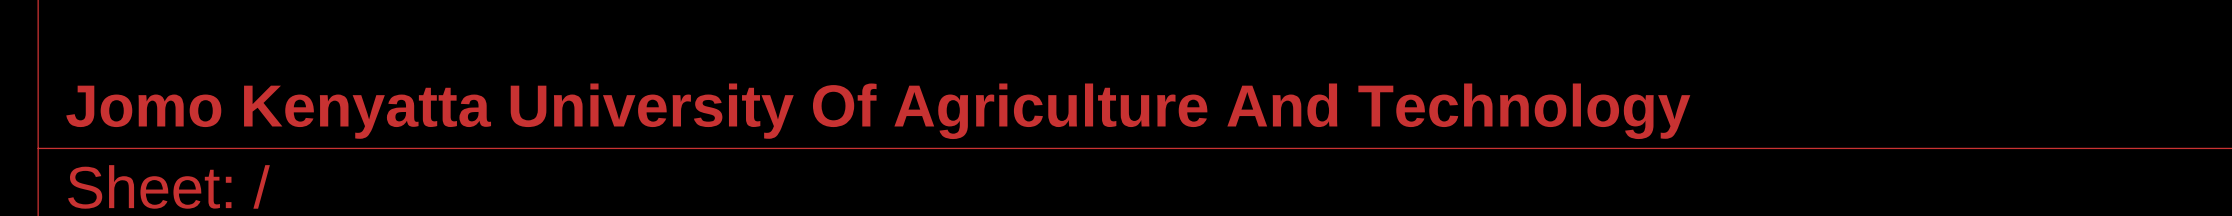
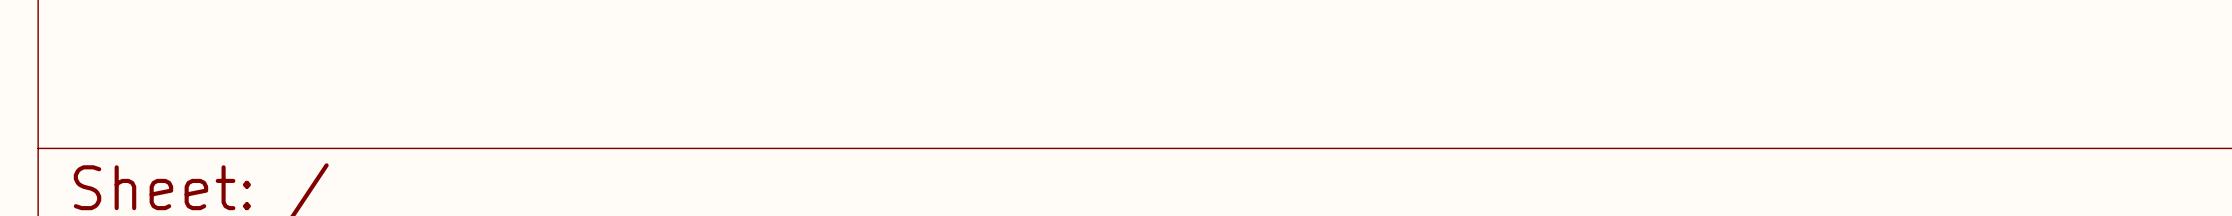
title block: Jomo Kenyatta University Of Agriculture And Technology (878, 111) -> none

